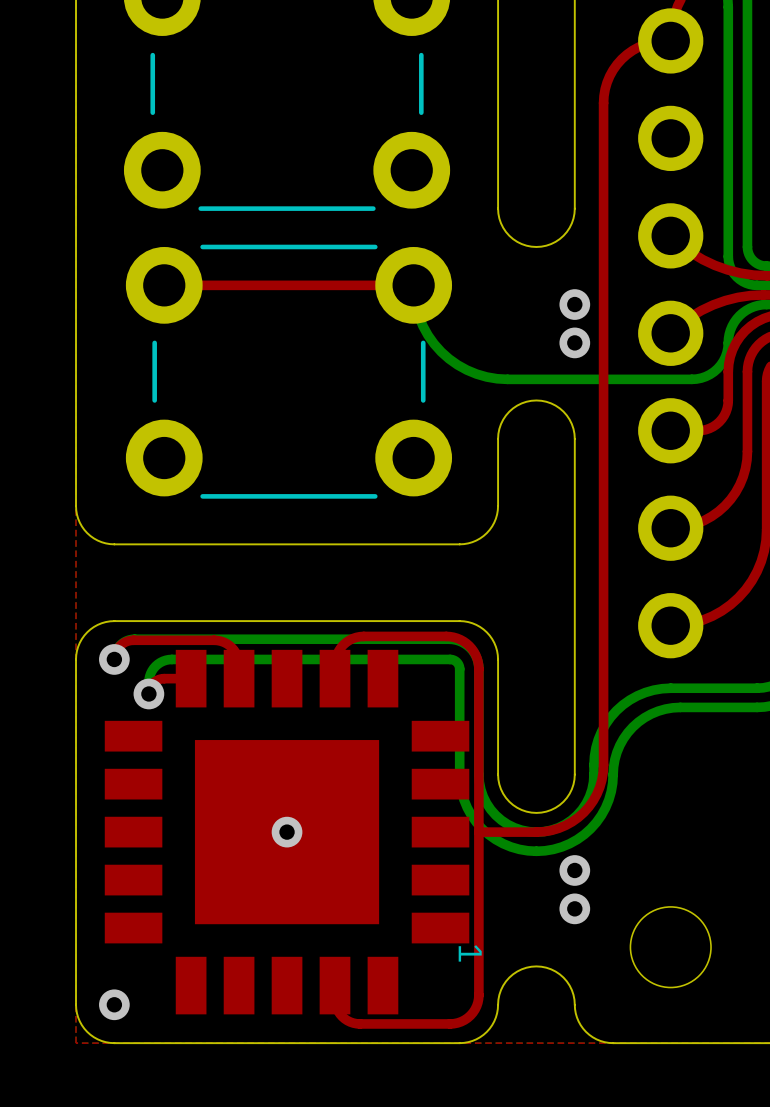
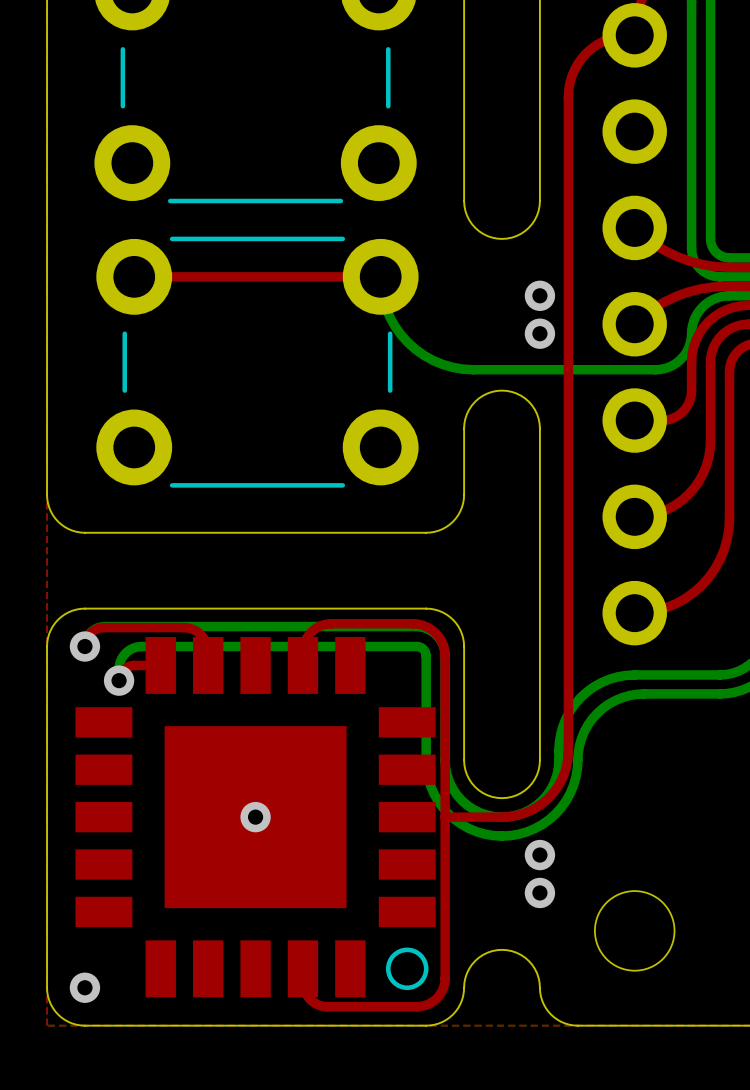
part footprint: [104, 649, 470, 1015] -> [75, 637, 436, 998]

